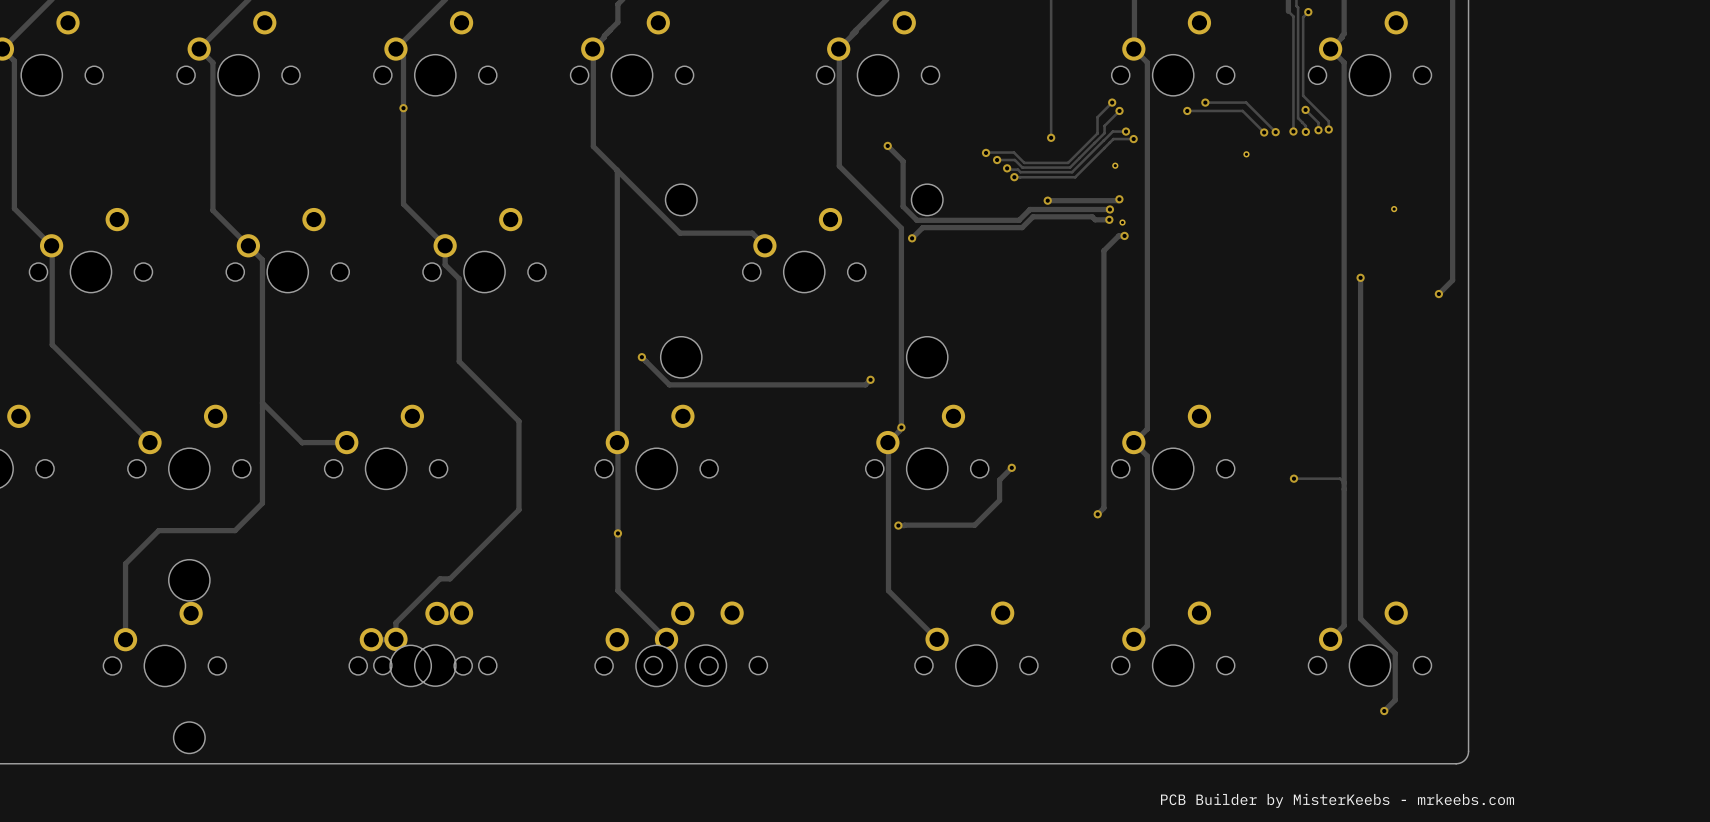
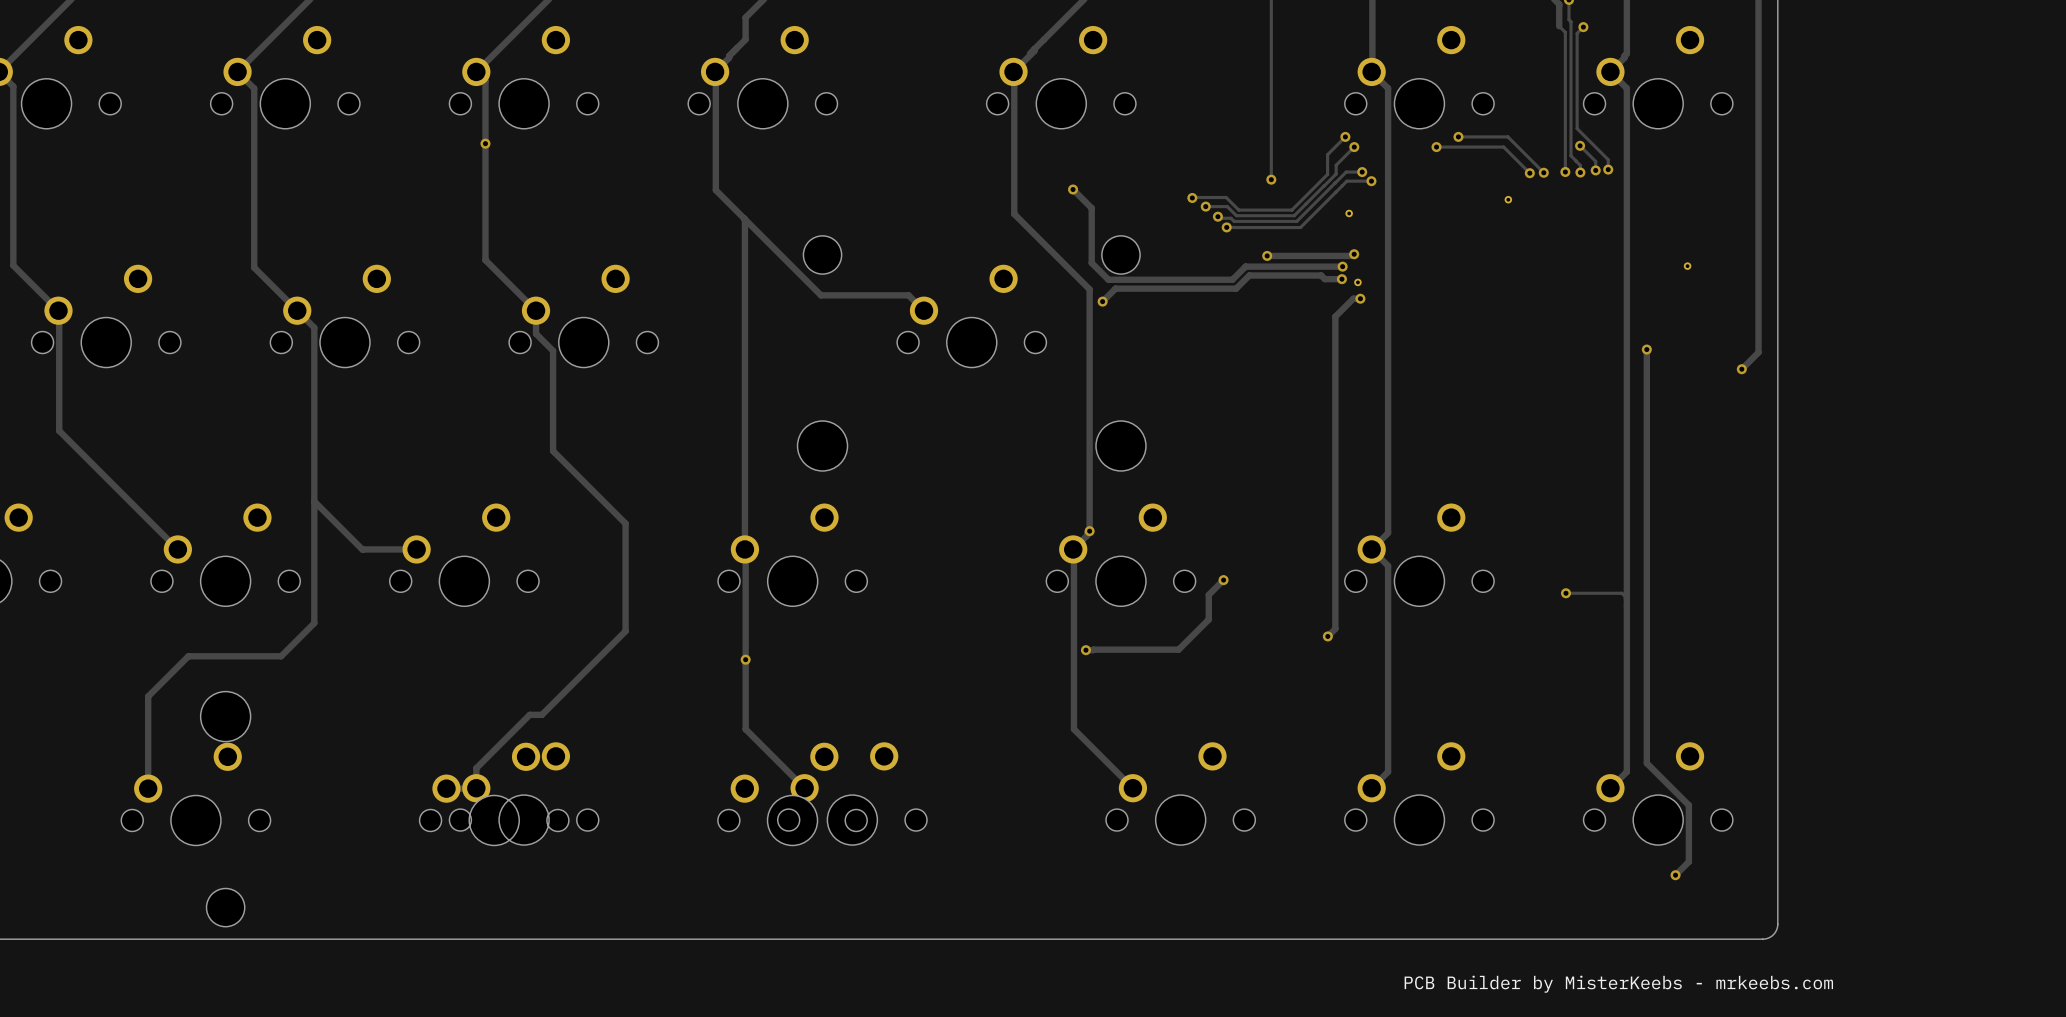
via: (641, 357) -> none
track: (646, 361) (669, 384) (865, 384) (870, 379) -> none
via: (870, 379) -> none

